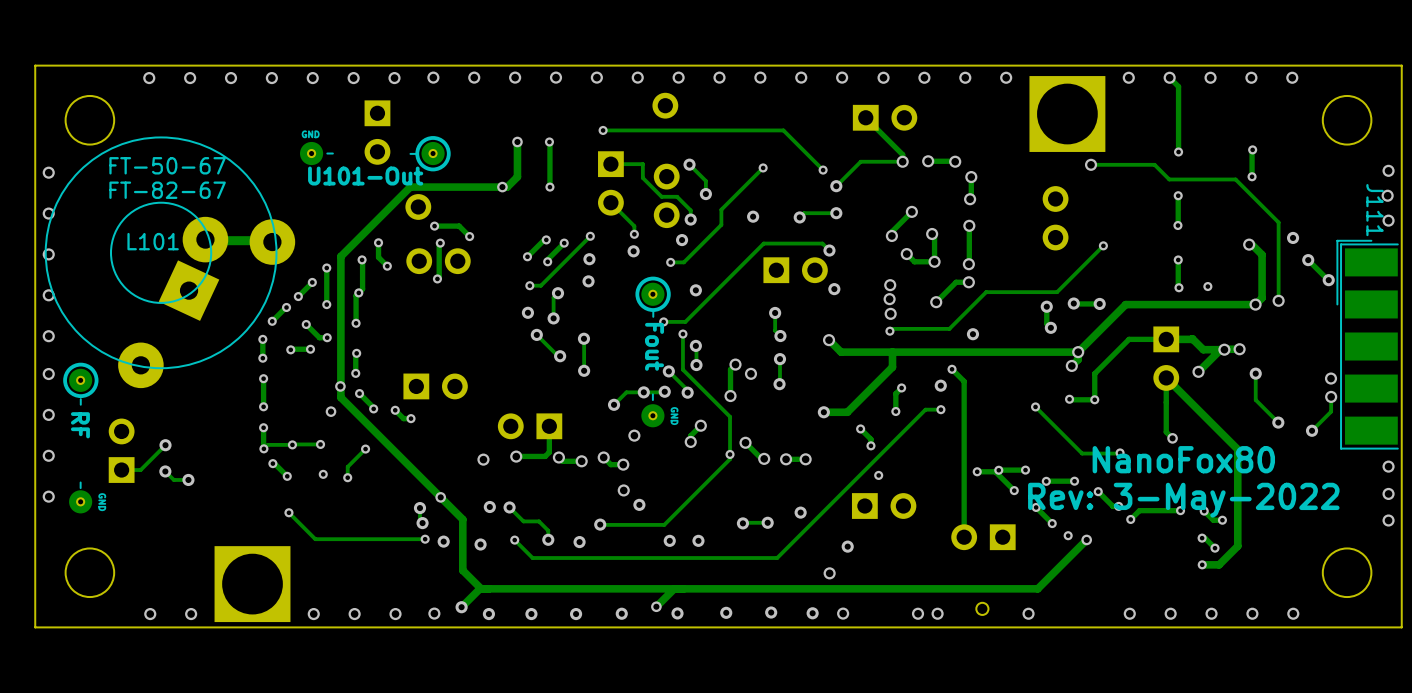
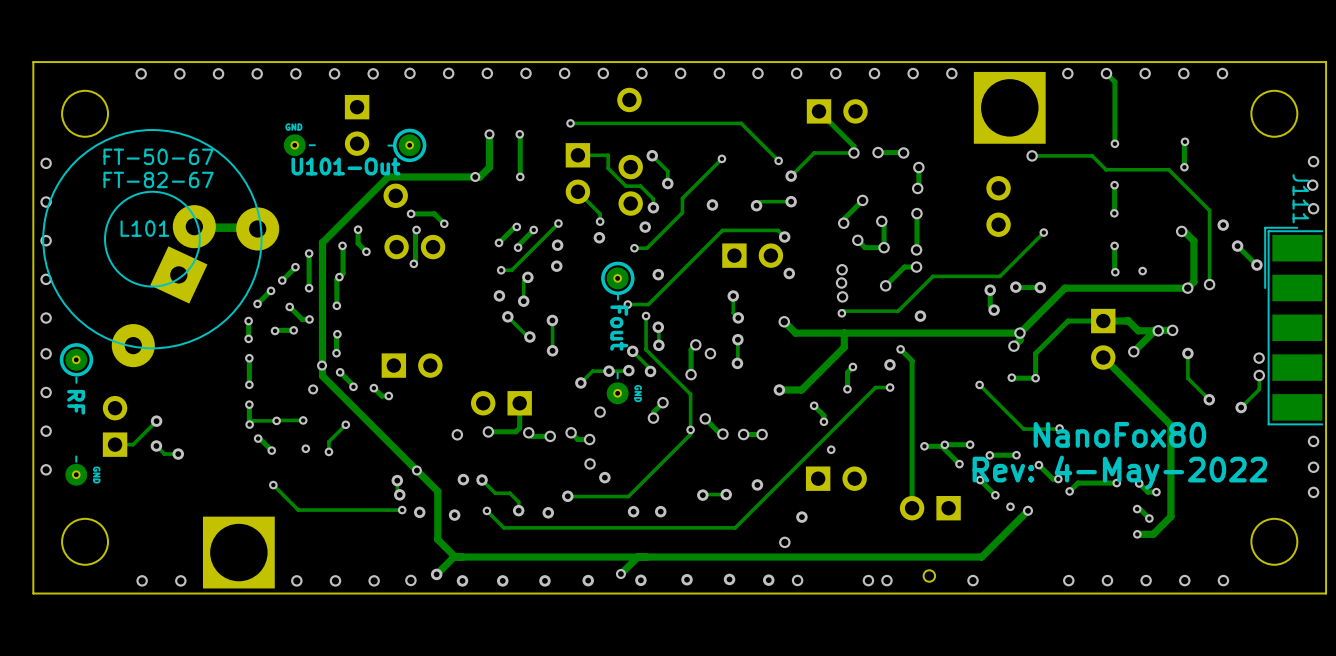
track: (1166, 377) (1166, 432) (1172, 438) -> none
via: (1172, 438) -> none
text: Rev: 3-May-2022 (1183, 500) -> Rev: 4-May-2022 (1119, 472)

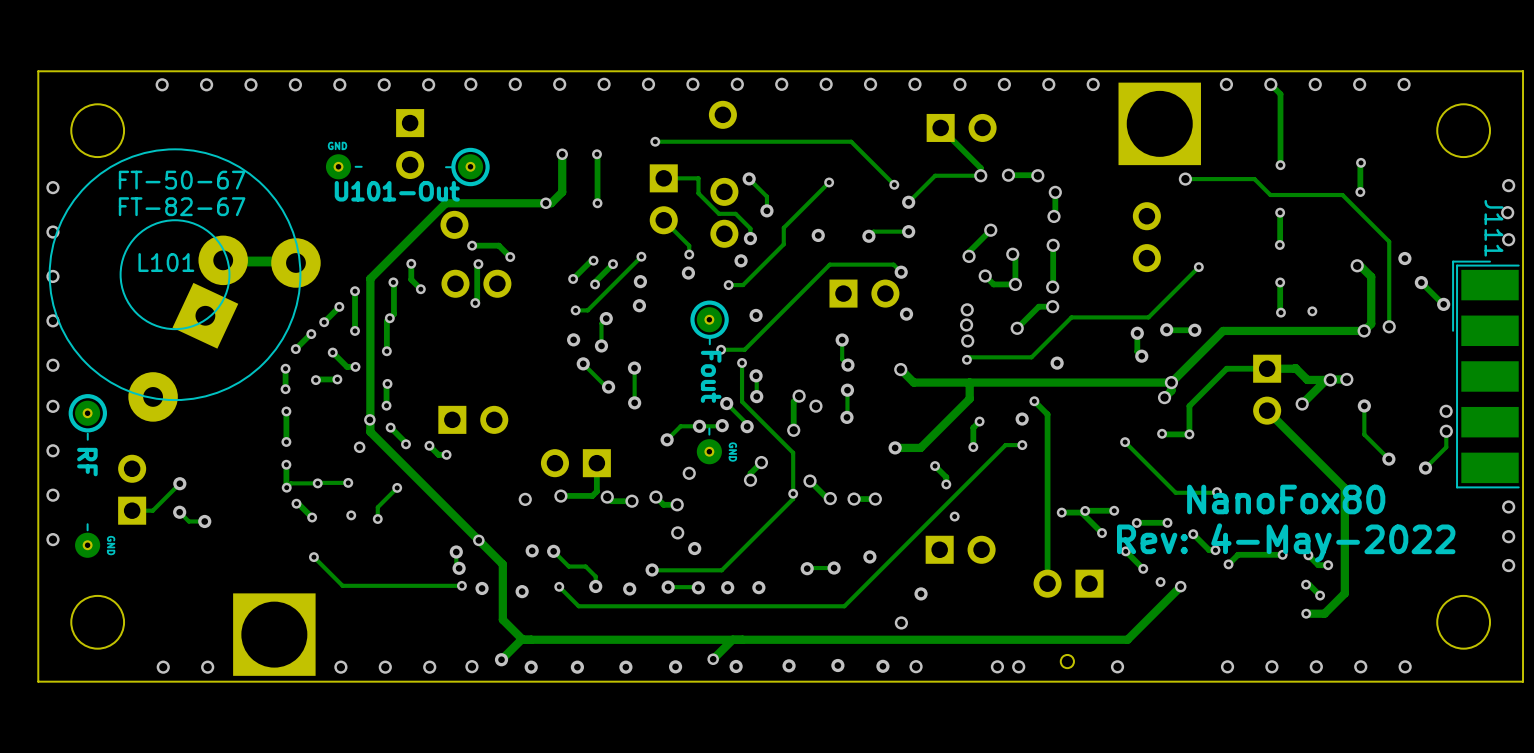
track: none -> (668, 587) (698, 587)
via: none -> (668, 587)
via: none -> (698, 587)

